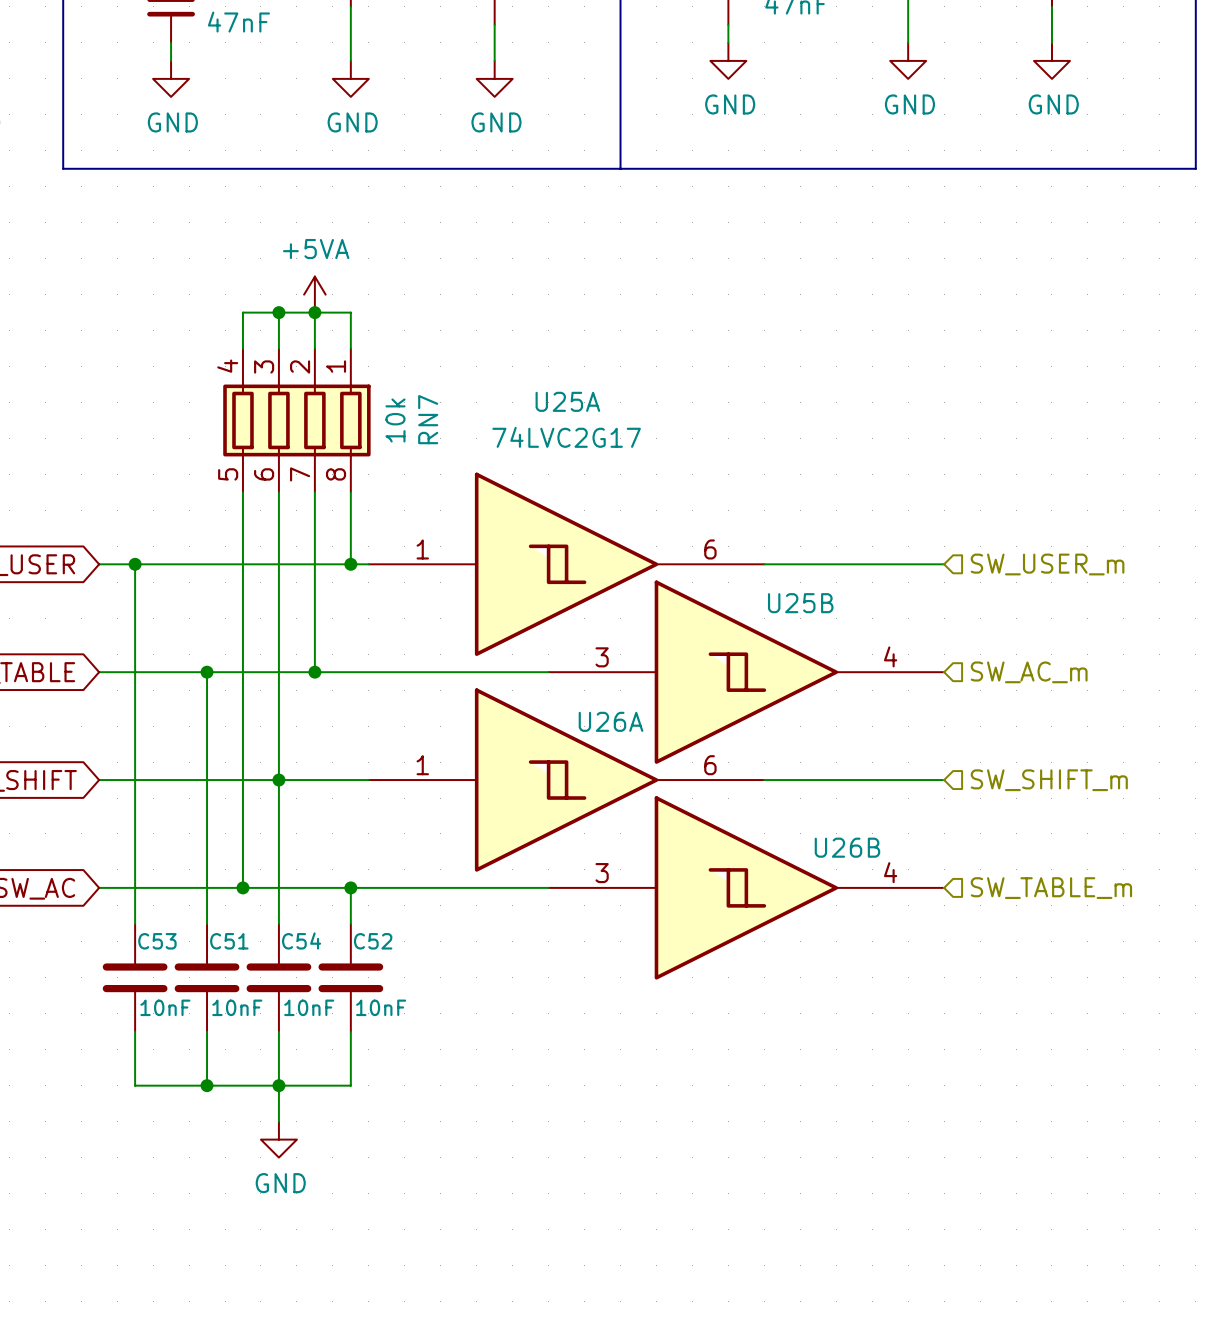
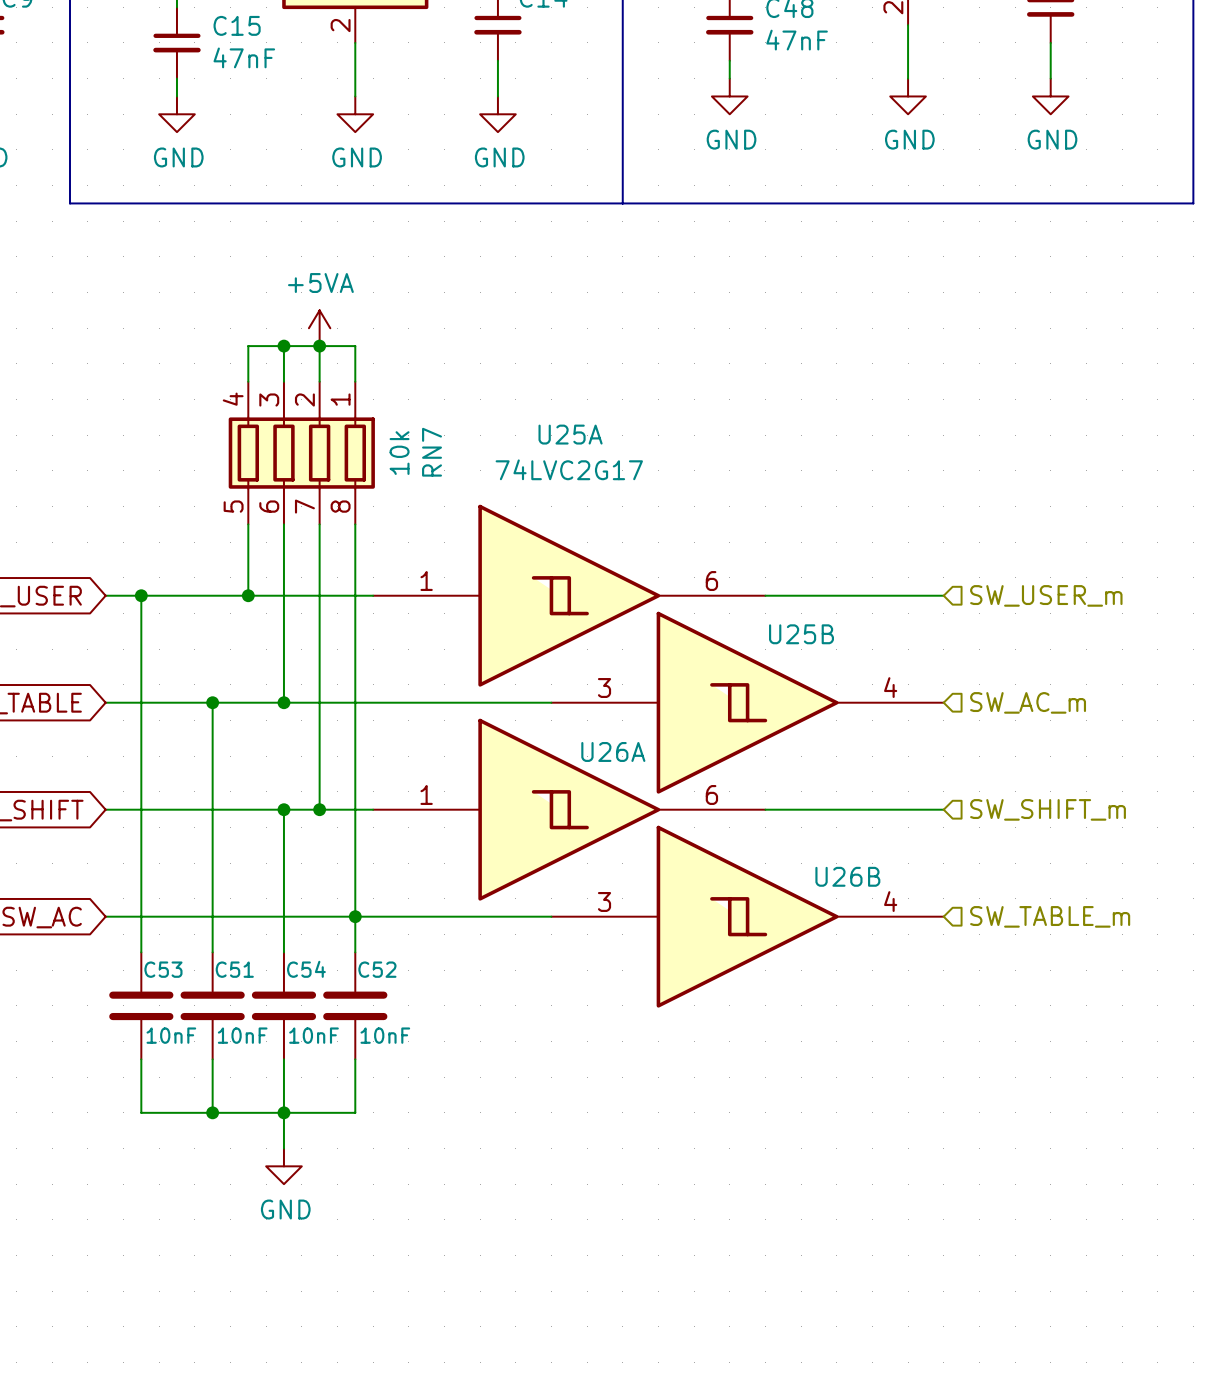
wire: (242, 564) (242, 887) -> (355, 595) (355, 916)
junction: none -> (248, 595)
junction: (350, 564) -> none
wire: (278, 672) (278, 780) -> (319, 702) (319, 809)
junction position: (314, 672) -> (283, 702)
junction: none -> (319, 809)
junction: (242, 887) -> none

